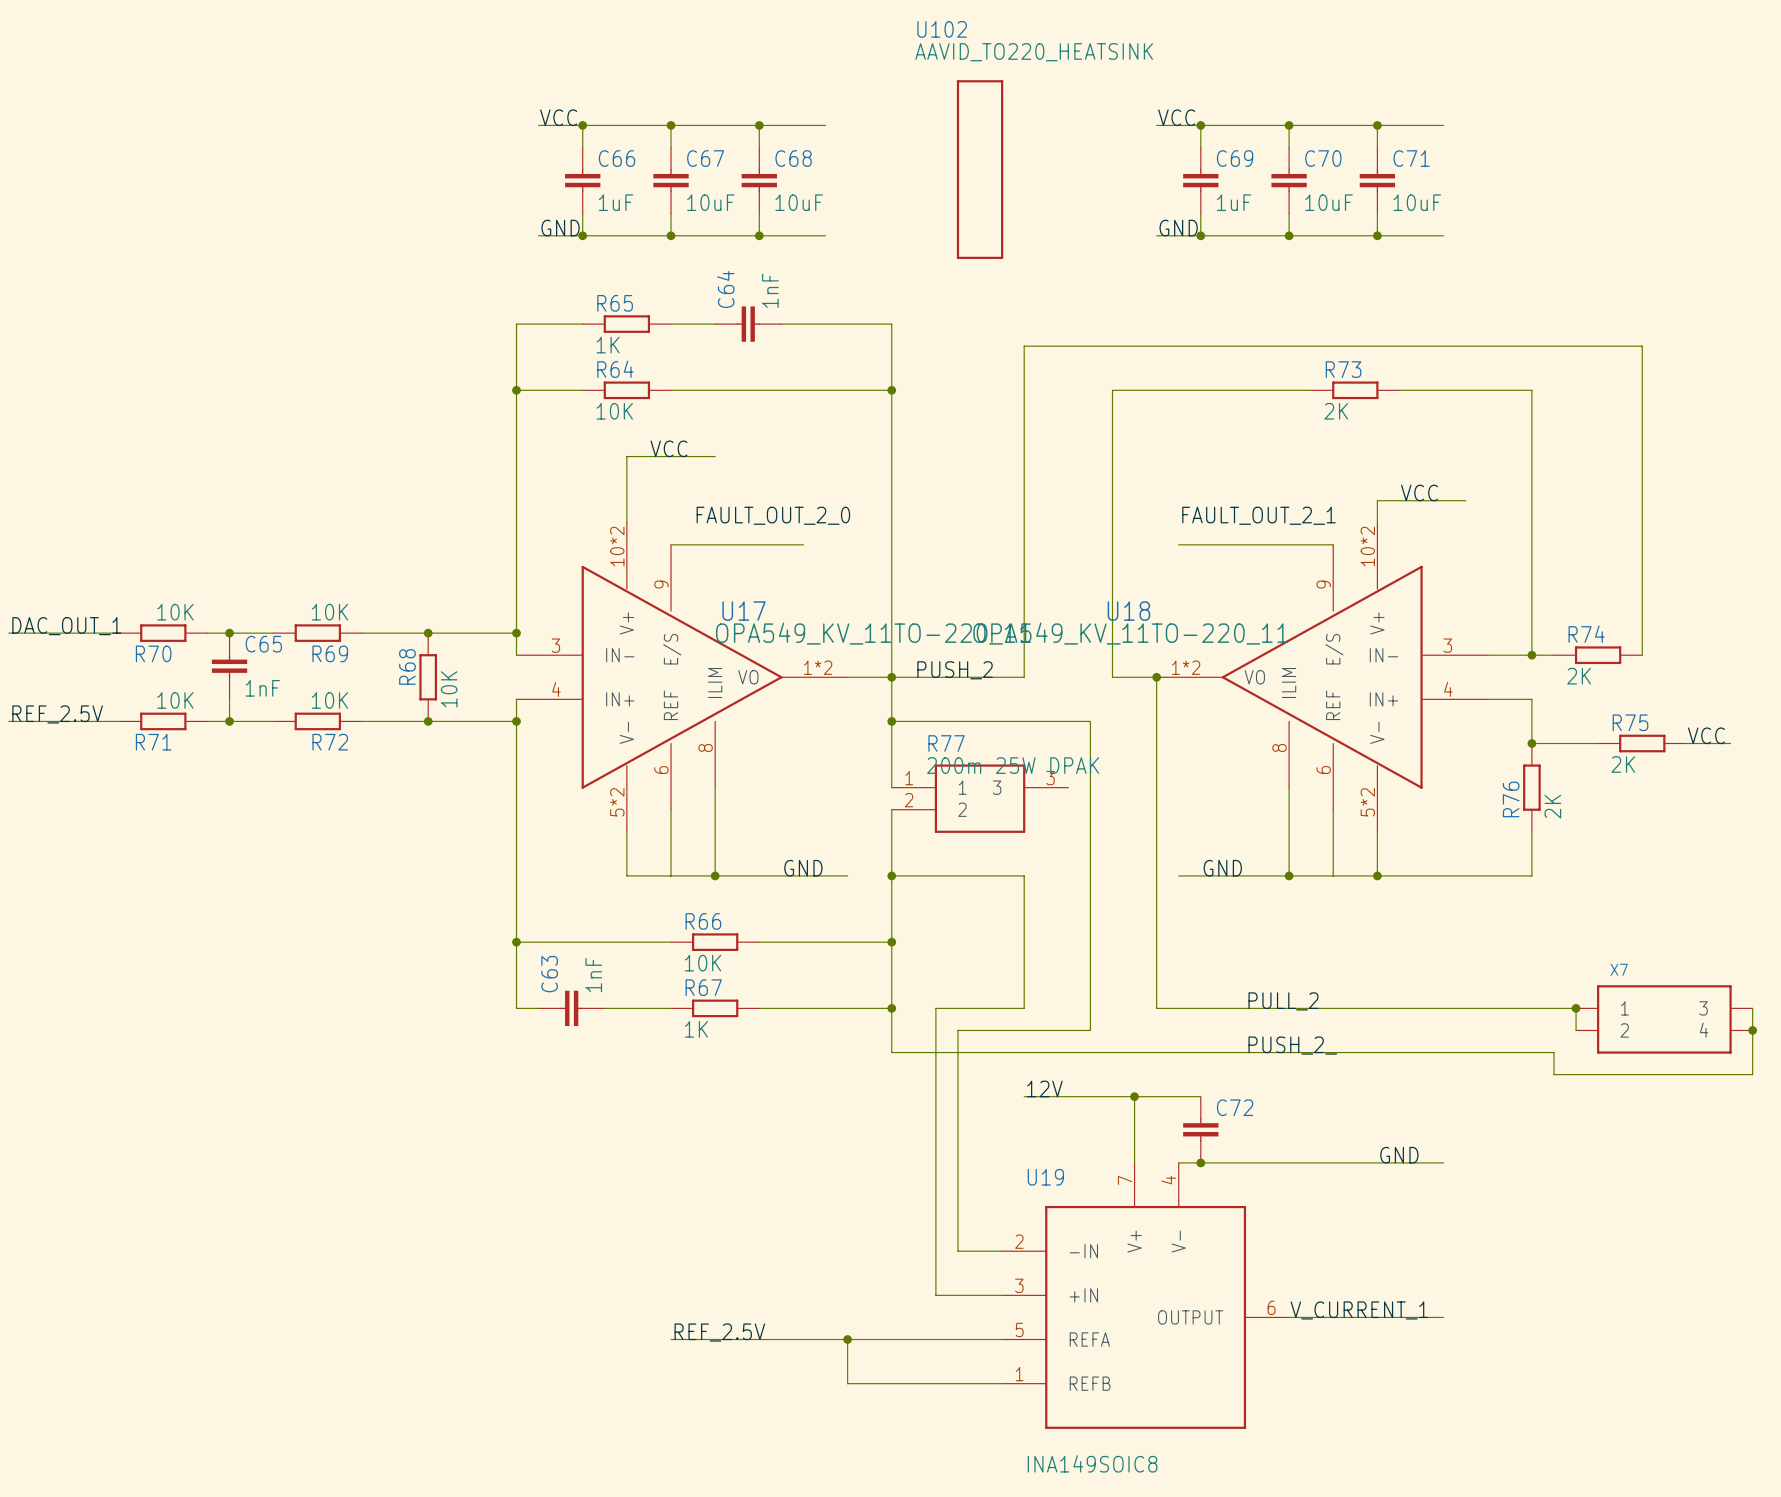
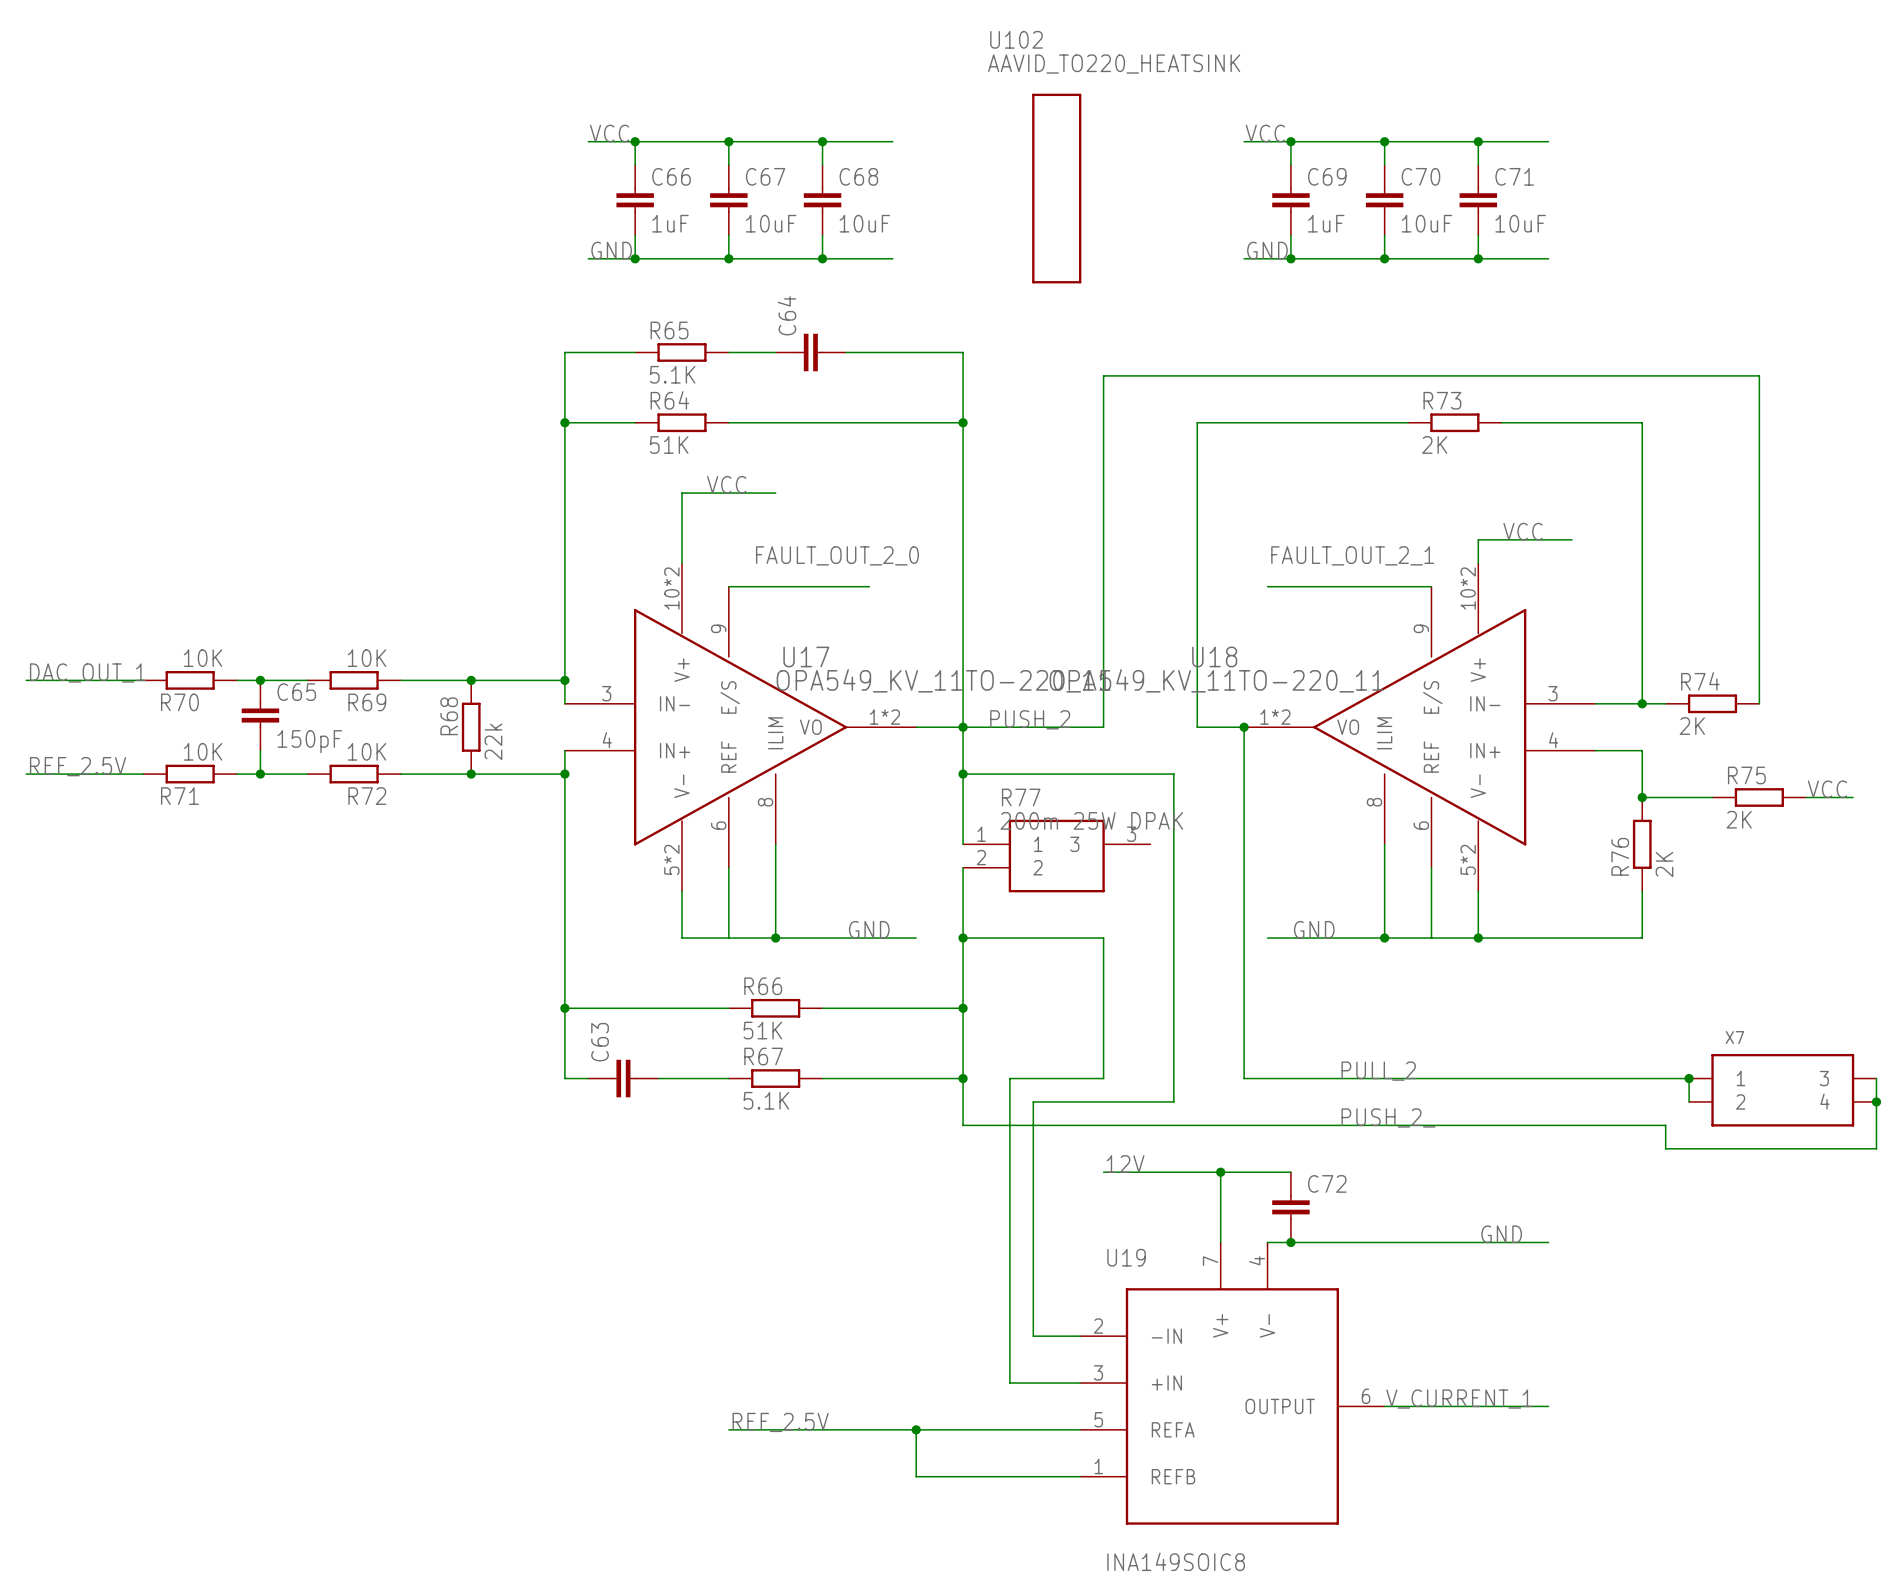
C64 value: 1nF (770, 290) -> none
R65 value: 1K (608, 345) -> 5.1K (672, 374)
R64 value: 10K (614, 411) -> 51K (669, 445)
C65 value: 1nF (262, 688) -> 150pF (309, 741)
R68 value: 10K (449, 689) -> 22k (493, 741)
R66 value: 10K (703, 963) -> 51K (762, 1030)
C63 value: 1nF (593, 975) -> none
R67 value: 1K (696, 1029) -> 5.1K (766, 1100)

